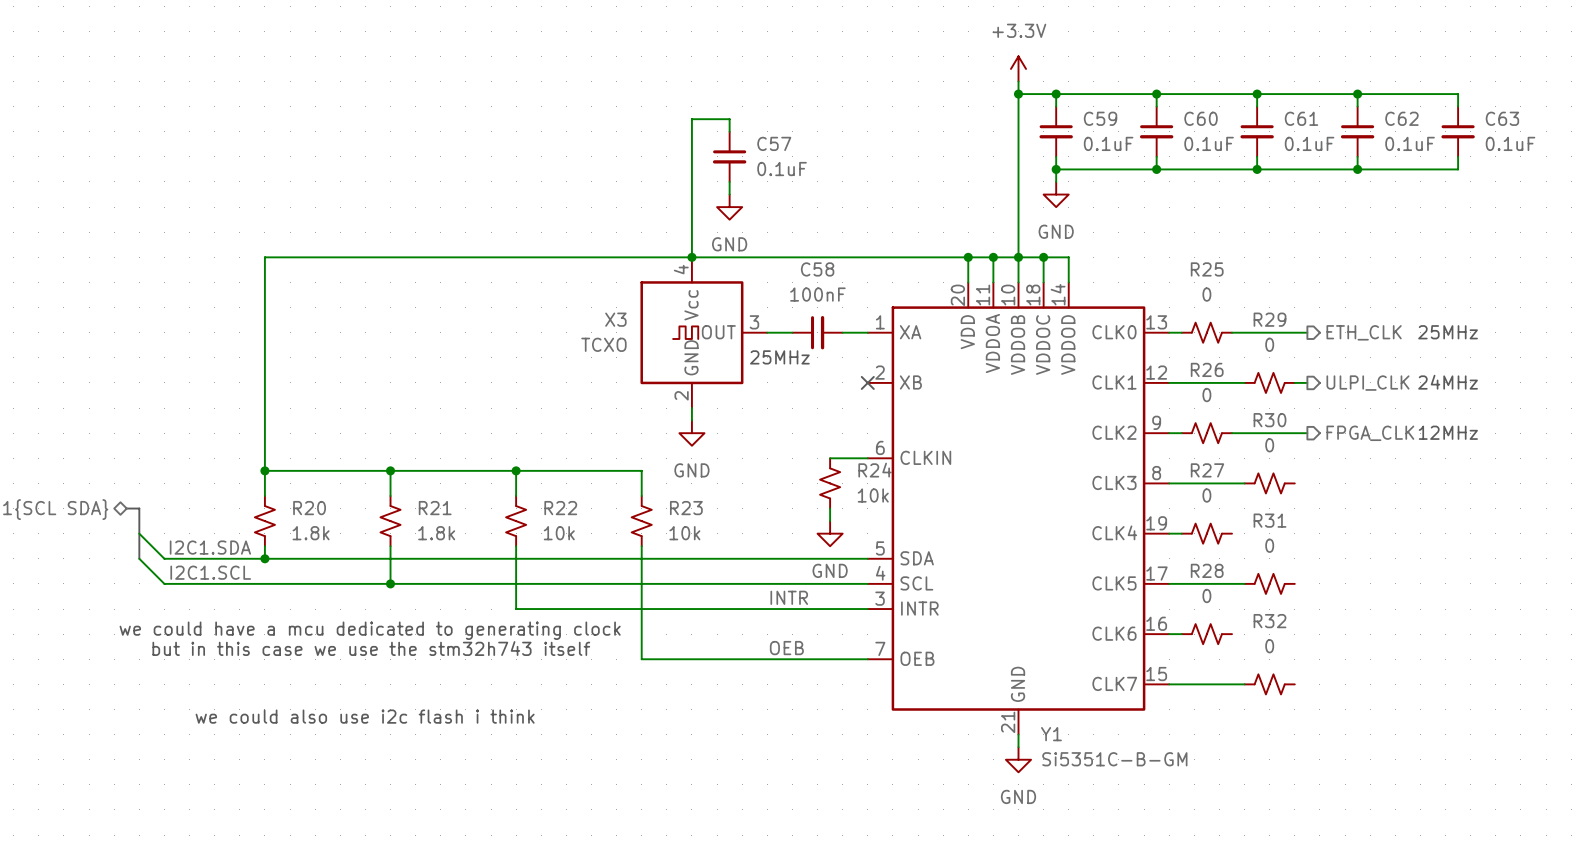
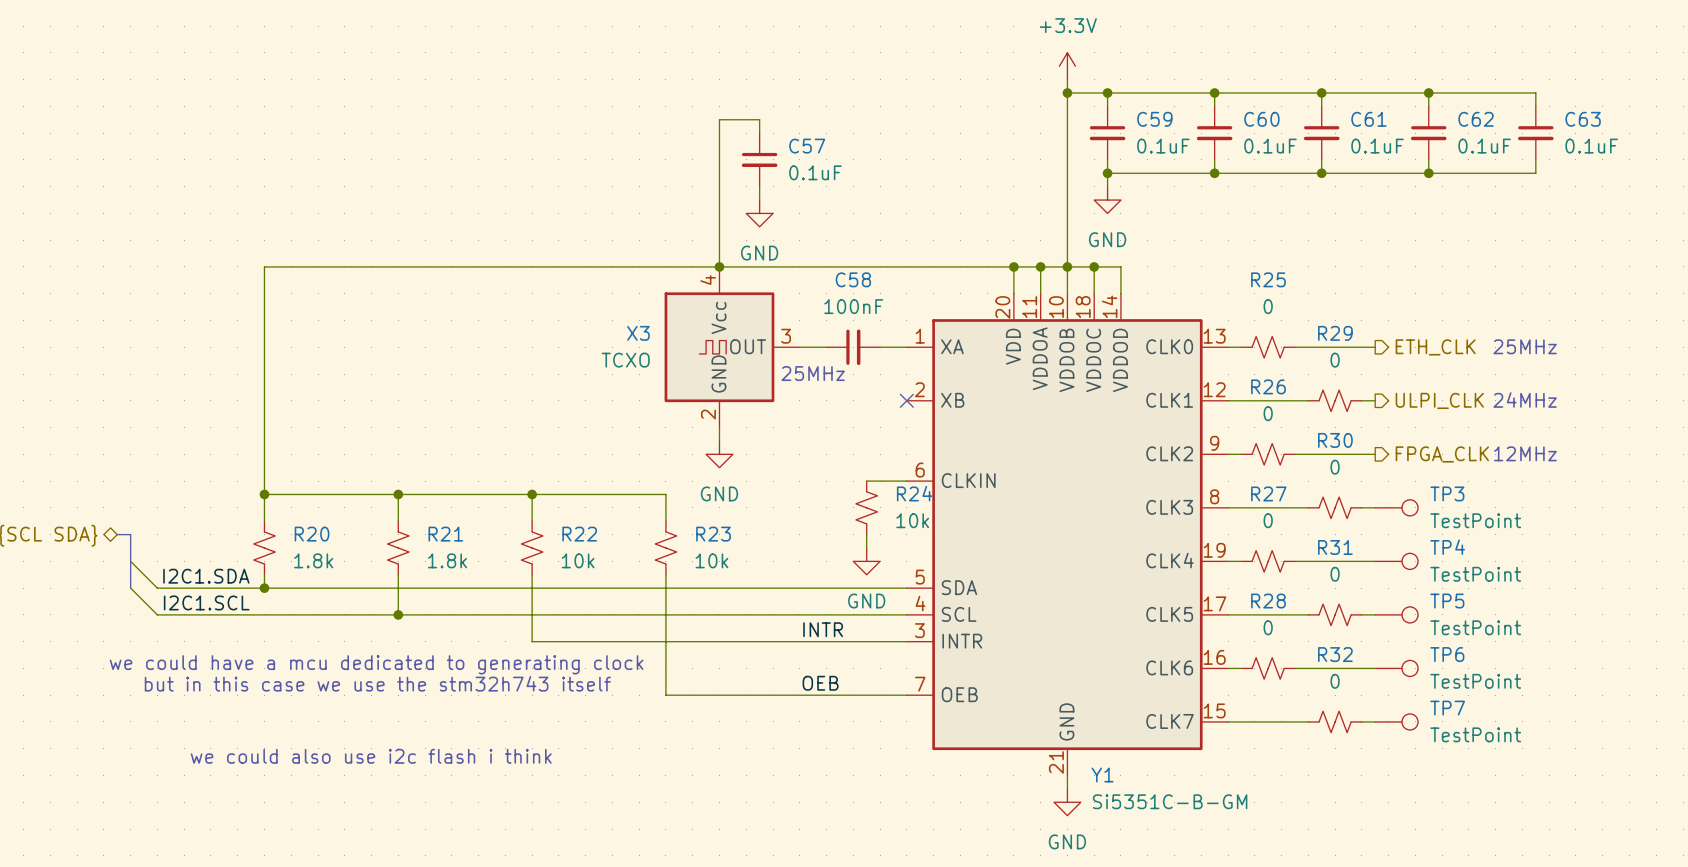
wire: none -> (1361, 507) (1375, 507)
TP3: none -> TestPoint (1396, 507)
wire: none -> (1294, 561) (1375, 561)
TP4: none -> TestPoint (1396, 561)
wire: none -> (1361, 614) (1375, 614)
TP5: none -> TestPoint (1396, 614)
wire: none -> (1294, 668) (1375, 668)
TP6: none -> TestPoint (1396, 668)
wire: none -> (1361, 721) (1375, 721)
TP7: none -> TestPoint (1396, 721)

